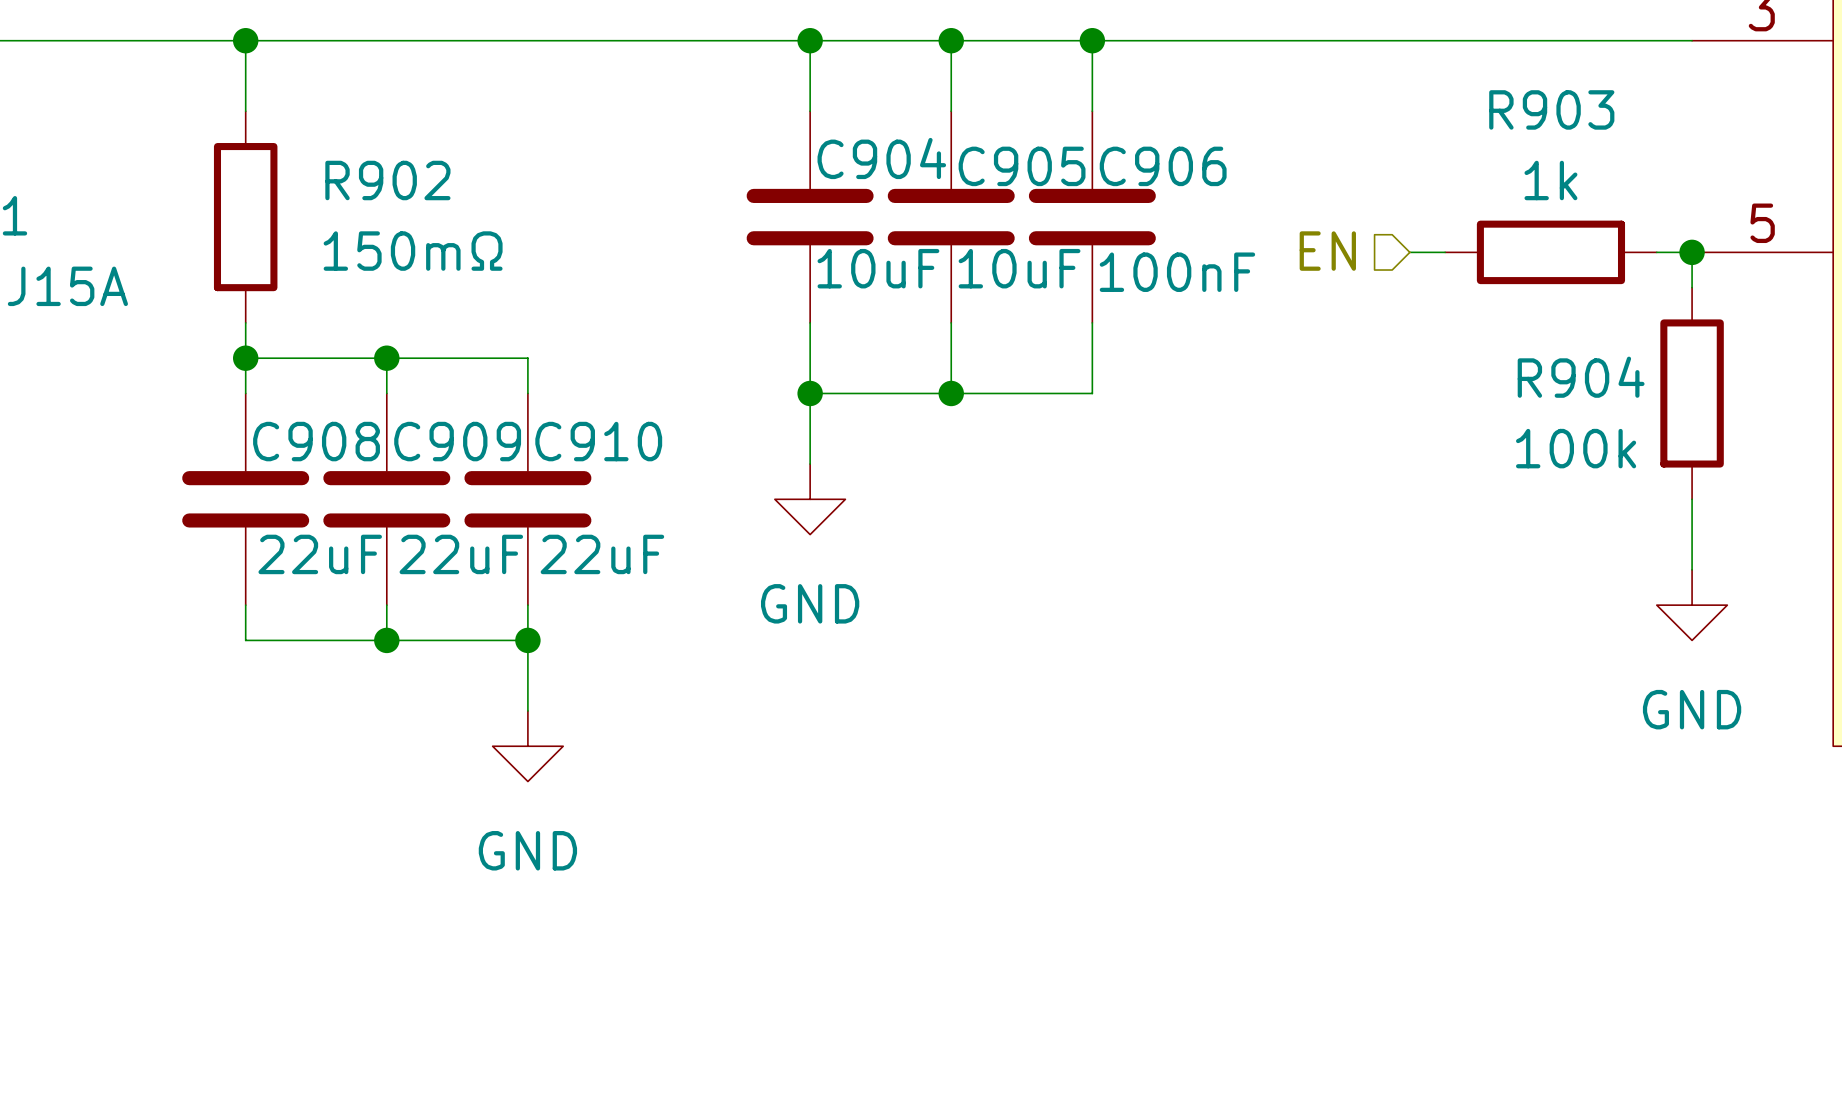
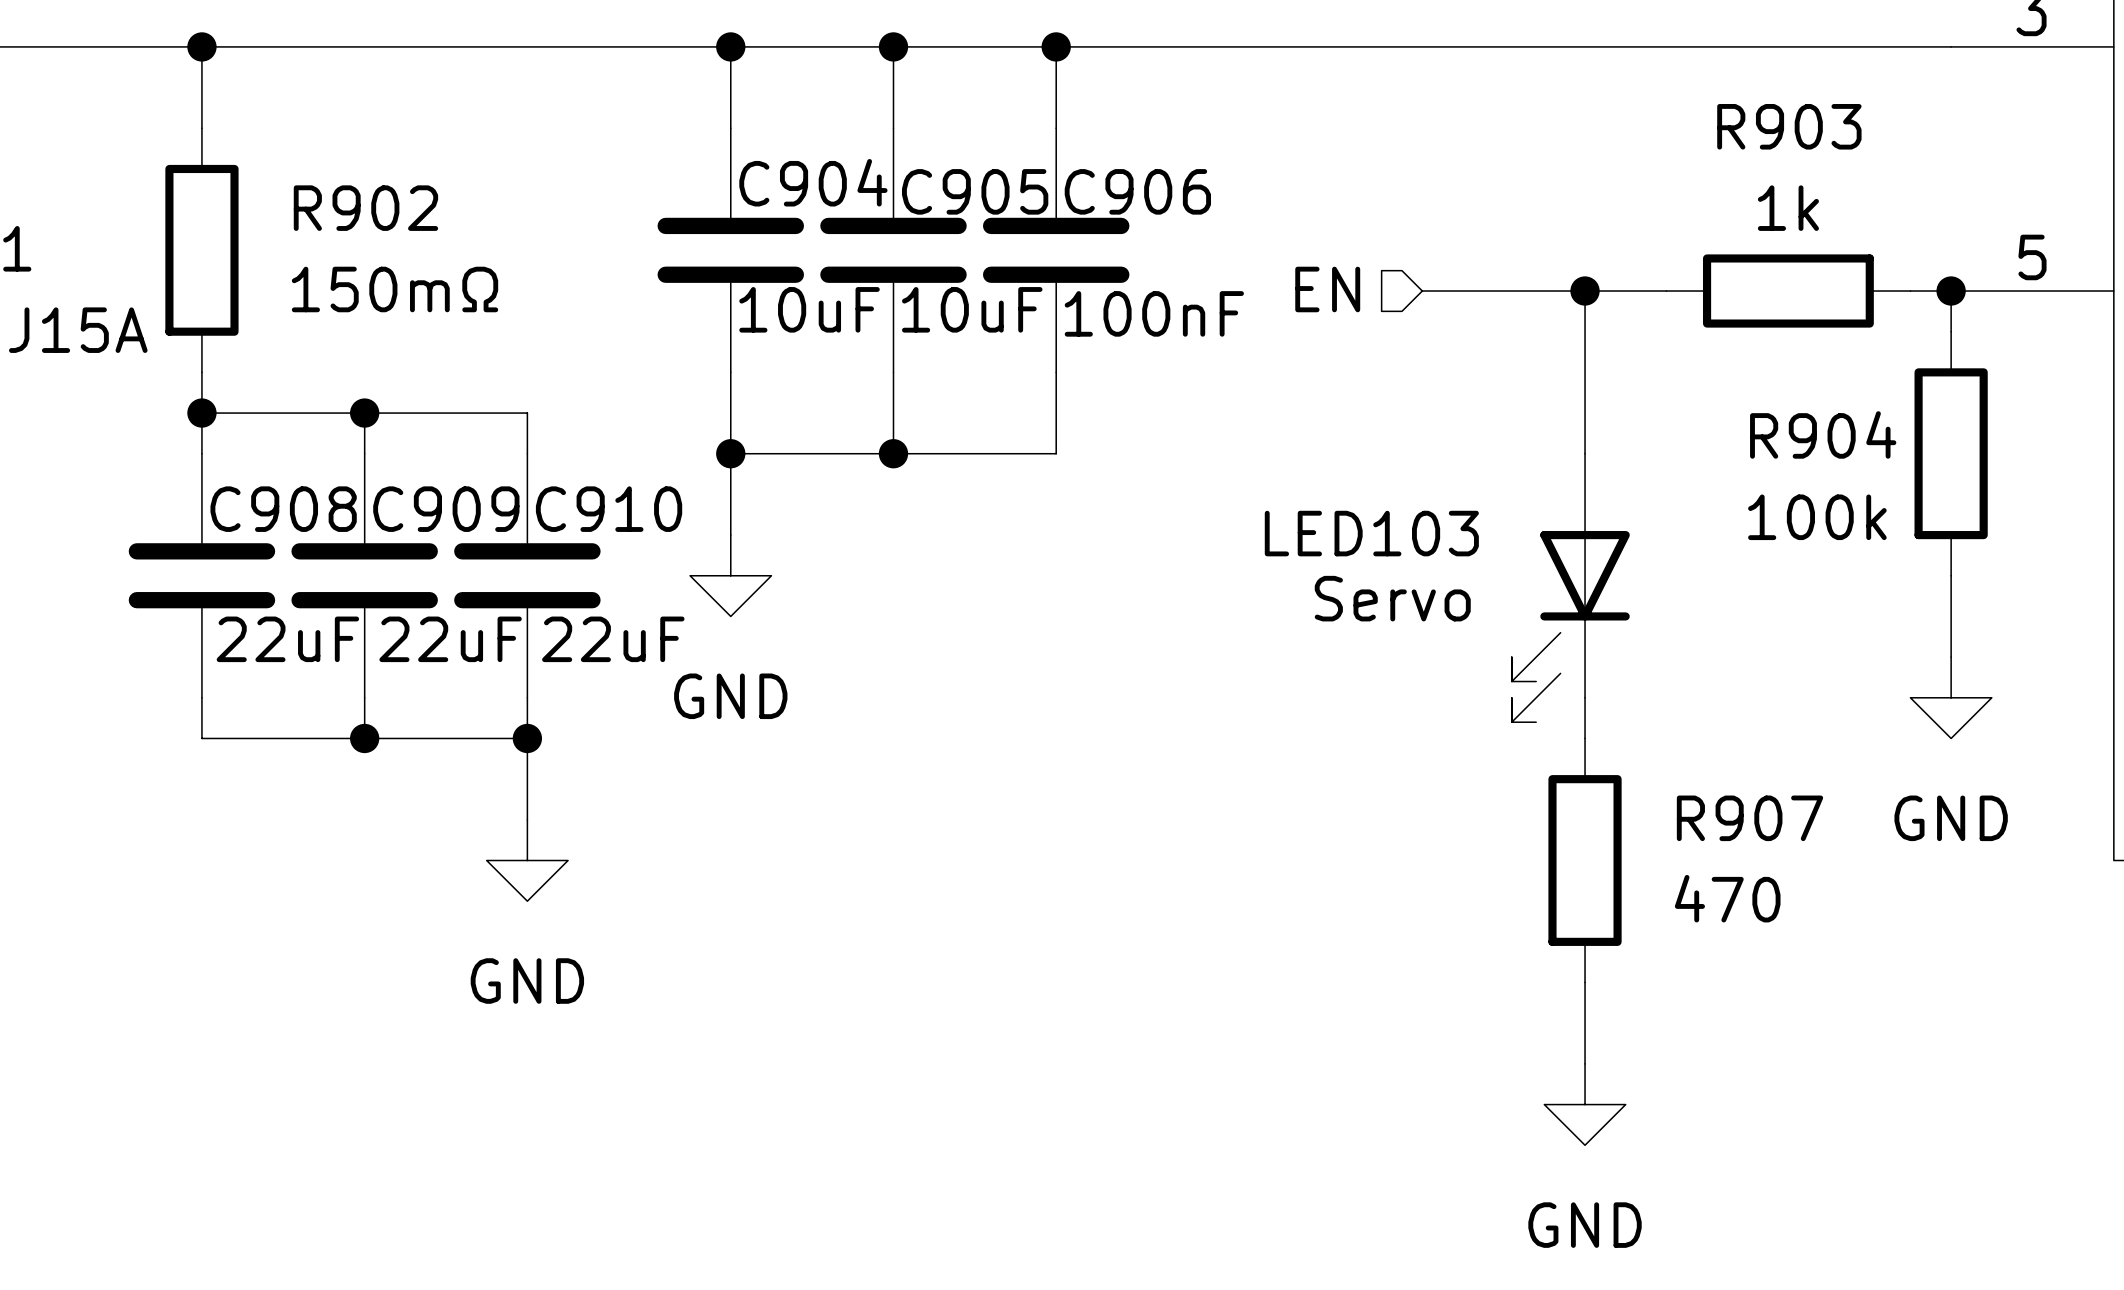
wire: (245, 40) (245, 111) -> (201, 46) (201, 128)
junction position: (245, 40) -> (201, 46)
junction: none -> (730, 46)
wire: (810, 40) (810, 111) -> (730, 46) (730, 128)
junction position: (810, 40) -> (893, 46)
wire: (951, 40) (951, 111) -> (893, 46) (893, 128)
junction position: (951, 40) -> (1056, 46)
wire: (1092, 40) (1092, 111) -> (1056, 46) (1056, 128)
junction: (1092, 40) -> none
R902 position: (245, 217) -> (201, 250)
C904 position: (810, 217) -> (730, 250)
C905 position: (951, 217) -> (893, 250)
C906 position: (1092, 217) -> (1056, 250)
hierarchical label position: EN (1327, 251) -> EN (1327, 289)
wire: none -> (1422, 291) (1625, 291)
wire: none -> (1585, 291) (1585, 453)
junction: none -> (1585, 291)
wire: (245, 322) (245, 393) -> (201, 372) (201, 453)
wire: (810, 322) (810, 464) -> (730, 372) (730, 535)
wire: (951, 322) (951, 393) -> (893, 372) (893, 453)
wire: (1092, 322) (1092, 393) (915, 393) -> (1056, 372) (1056, 453)
junction: none -> (201, 413)
junction: (245, 358) -> none
junction: none -> (364, 413)
wire: (386, 358) (386, 393) -> (364, 413) (364, 453)
junction: (386, 358) -> none
wire: (457, 358) (527, 358) (527, 393) -> (527, 413) (527, 453)
wire: none -> (730, 453) (934, 453)
junction: none -> (730, 453)
junction position: (810, 393) -> (893, 453)
junction: (951, 393) -> none
C908 position: (245, 499) -> (201, 575)
C909 position: (386, 499) -> (364, 575)
C910 position: (527, 499) -> (527, 575)
power symbol: none -> GND (730, 575)
power symbol: GND (810, 499) -> none
LED103: none -> Servo (1570, 587)
wire: (245, 605) (245, 640) -> (201, 697) (201, 738) (283, 738)
wire: (386, 605) (386, 640) -> (364, 697) (364, 738)
wire: (527, 605) (527, 710) -> (527, 697) (527, 819)
wire: none -> (1585, 697) (1585, 738)
junction: none -> (364, 738)
junction: (386, 640) -> none
wire: (457, 640) (527, 640) -> (201, 413) (283, 413)
junction: none -> (527, 738)
junction: (527, 640) -> none
power symbol position: GND (527, 746) -> GND (527, 860)
R907: none -> 470 (1585, 860)
wire: none -> (1585, 982) (1585, 1063)
power symbol: none -> GND (1585, 1104)

